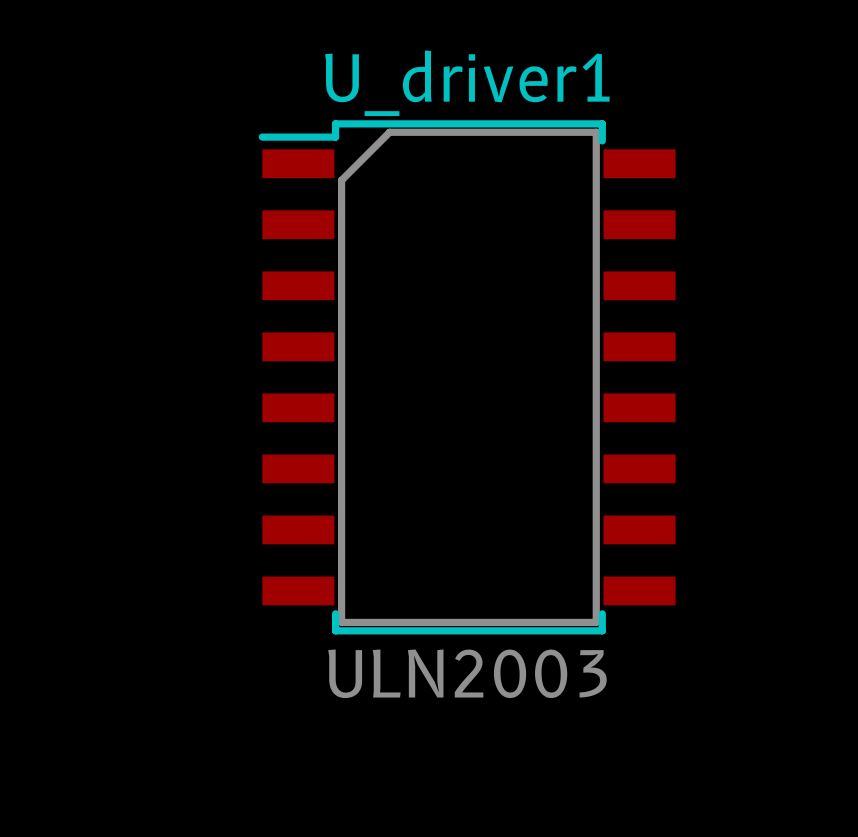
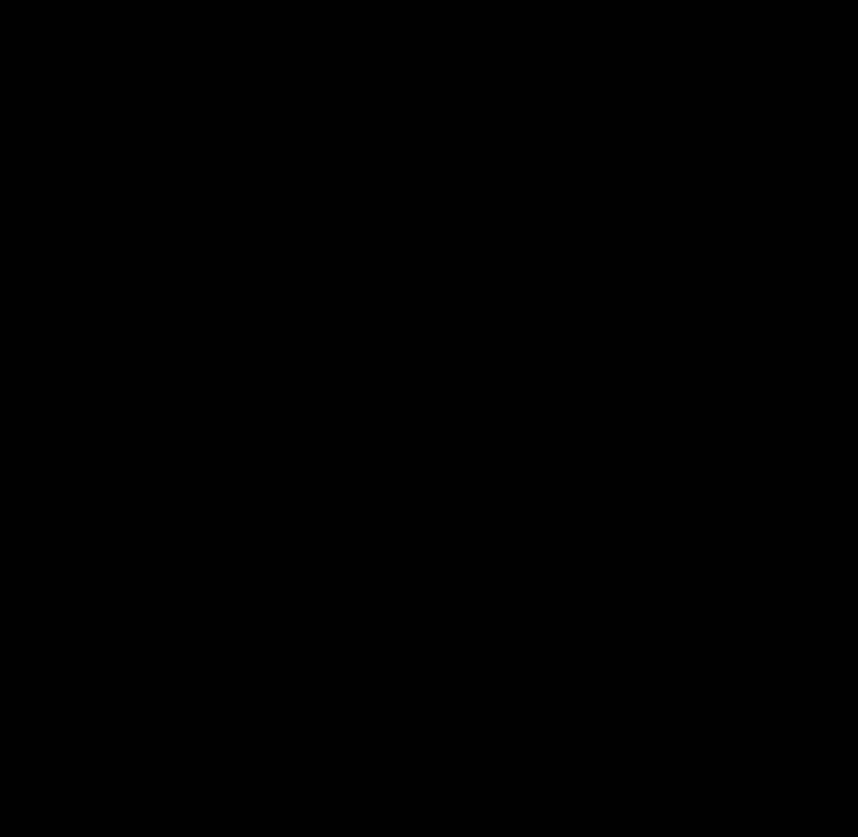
U_driver1: ULN2003 (467, 377) -> none

